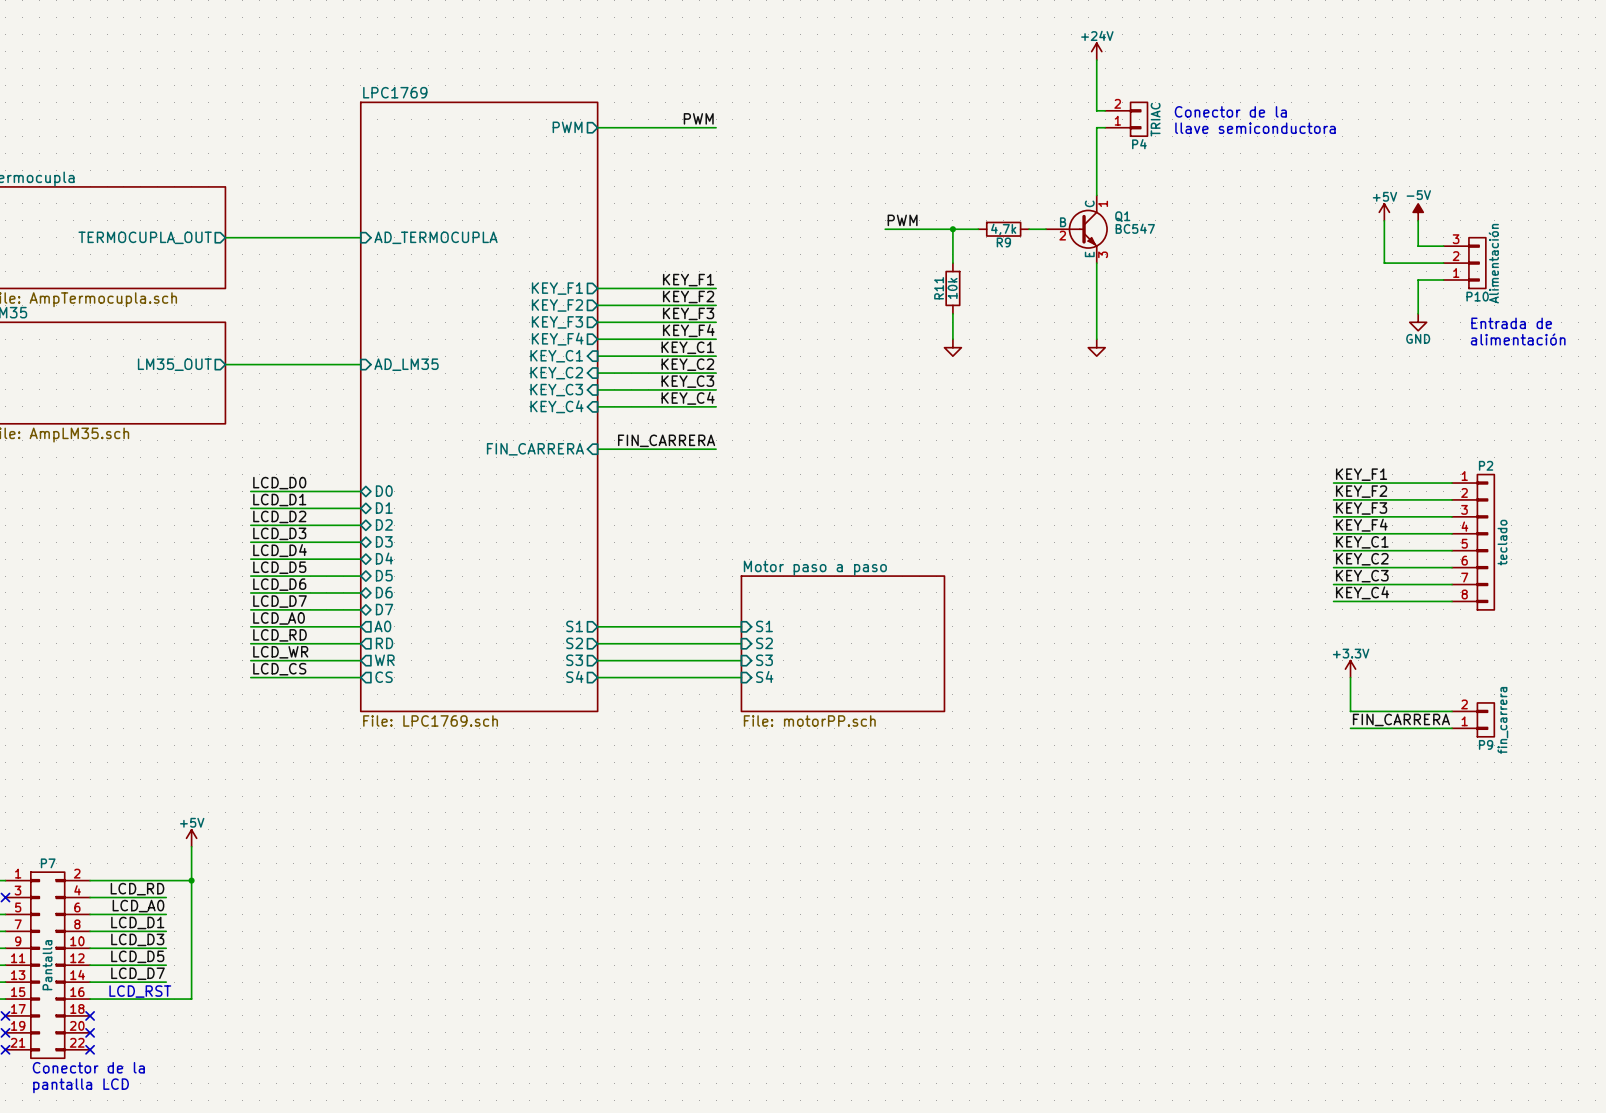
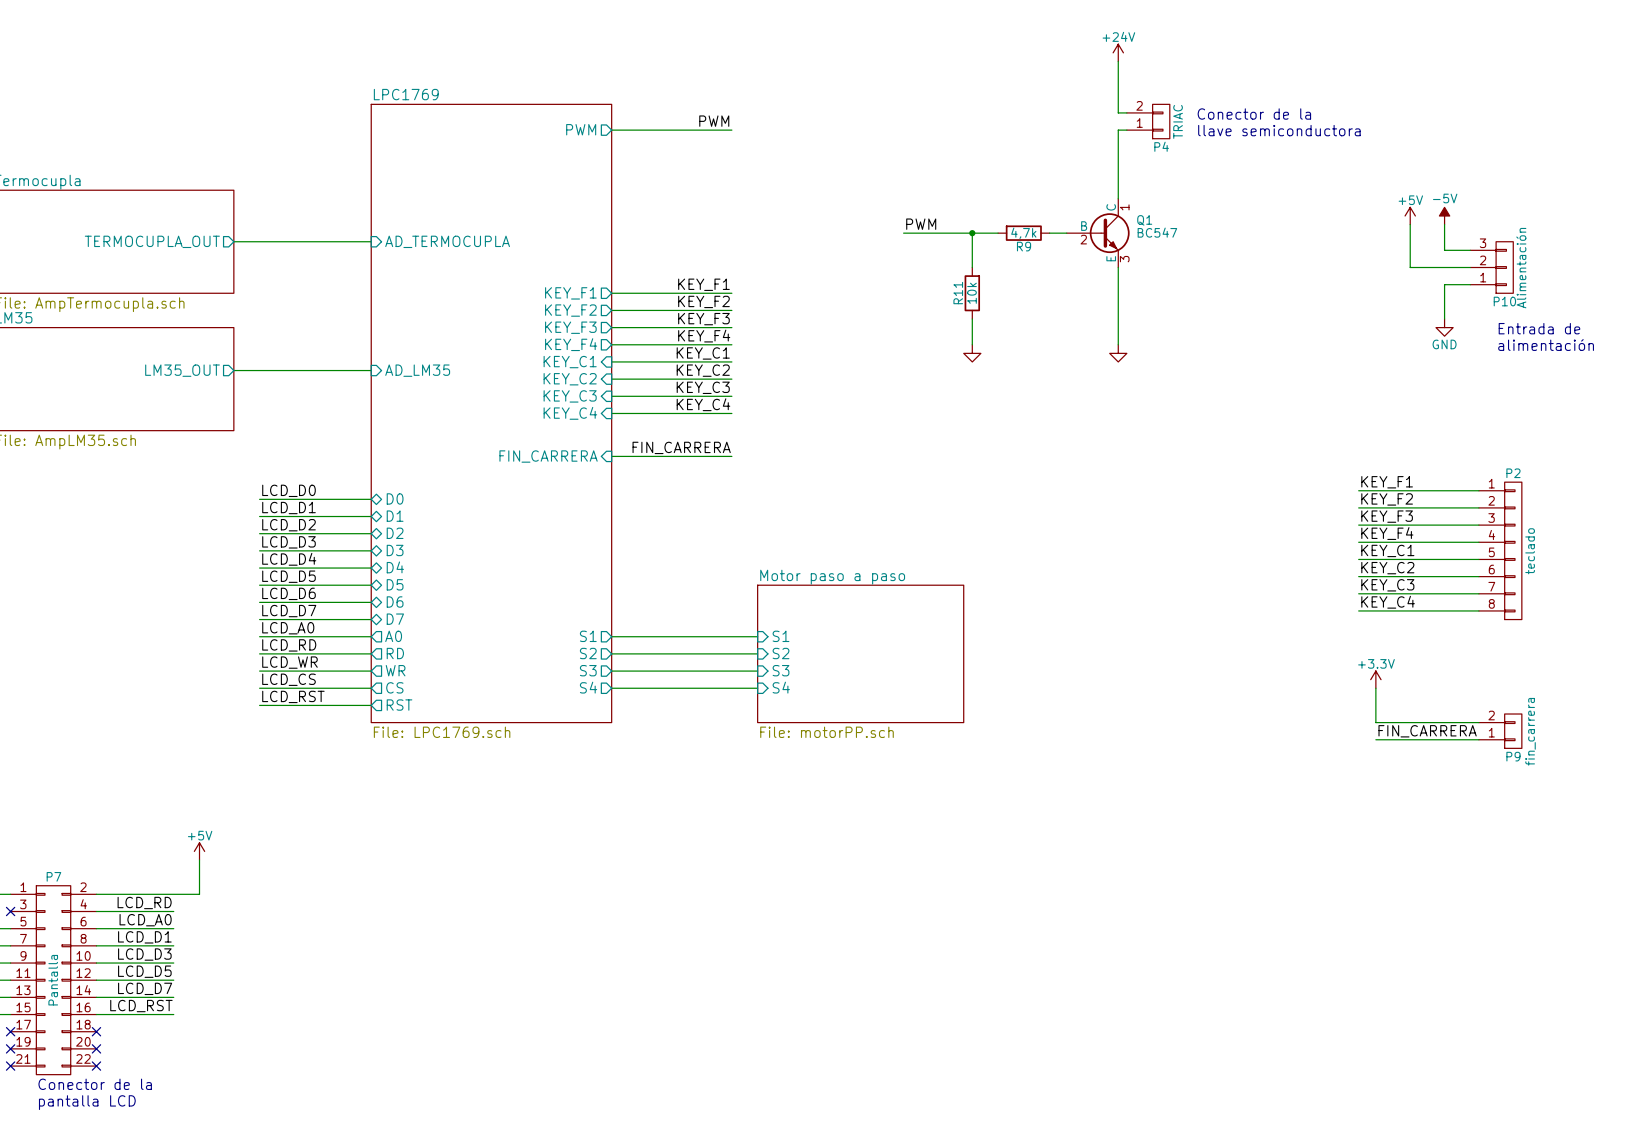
label: none -> LCD_RST (293, 696)
wire: none -> (259, 705) (371, 705)
sheet pin: none -> RST (399, 705)
wire: (191, 880) (191, 999) (166, 999) -> none
junction: (191, 880) -> none
label: none -> LCD_RST (141, 1006)
text: LCD_RST (140, 991) -> none

